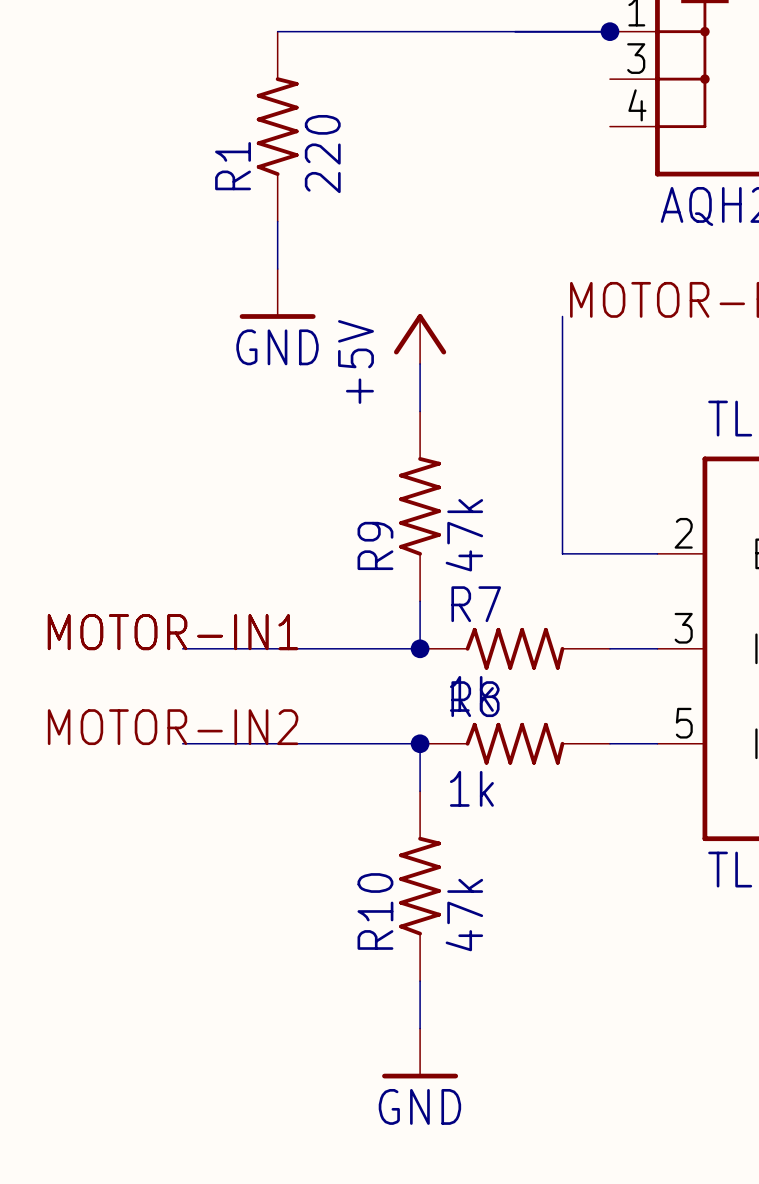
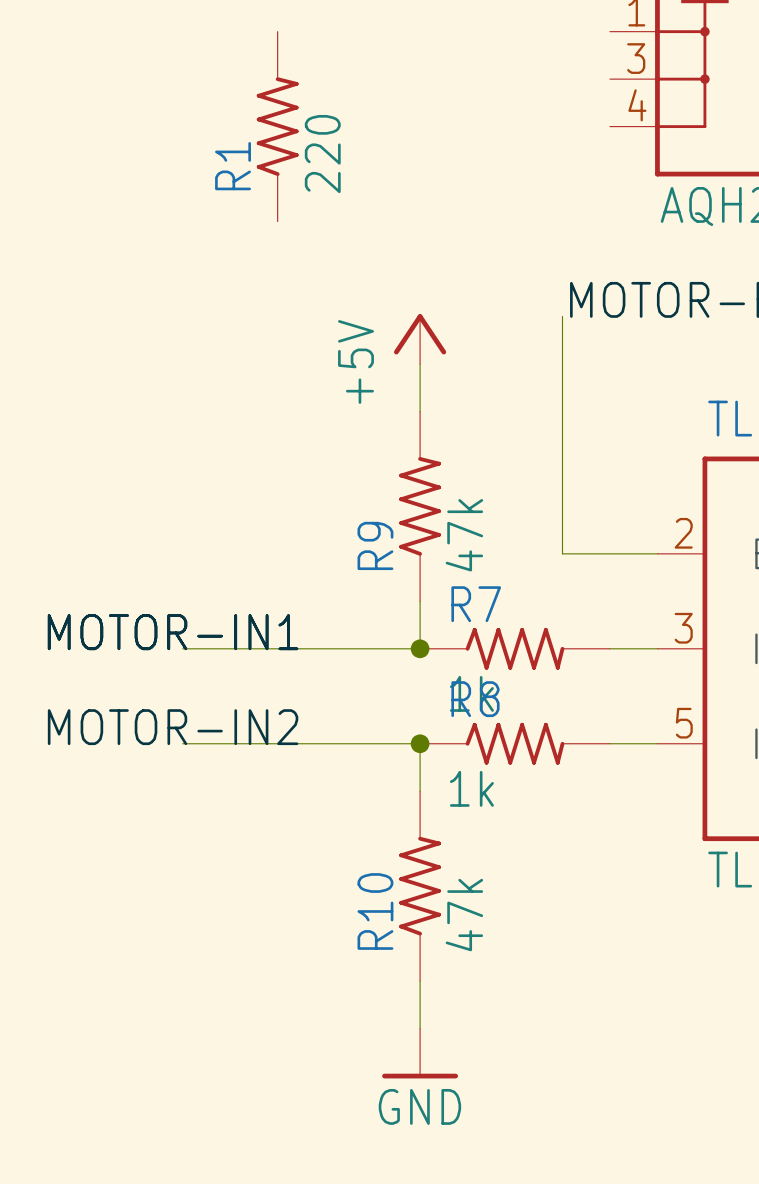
wire: (277, 31) (609, 31) -> none
junction: (609, 31) -> none
wire: (277, 221) (277, 269) -> none
power symbol: GND (277, 293) -> none

